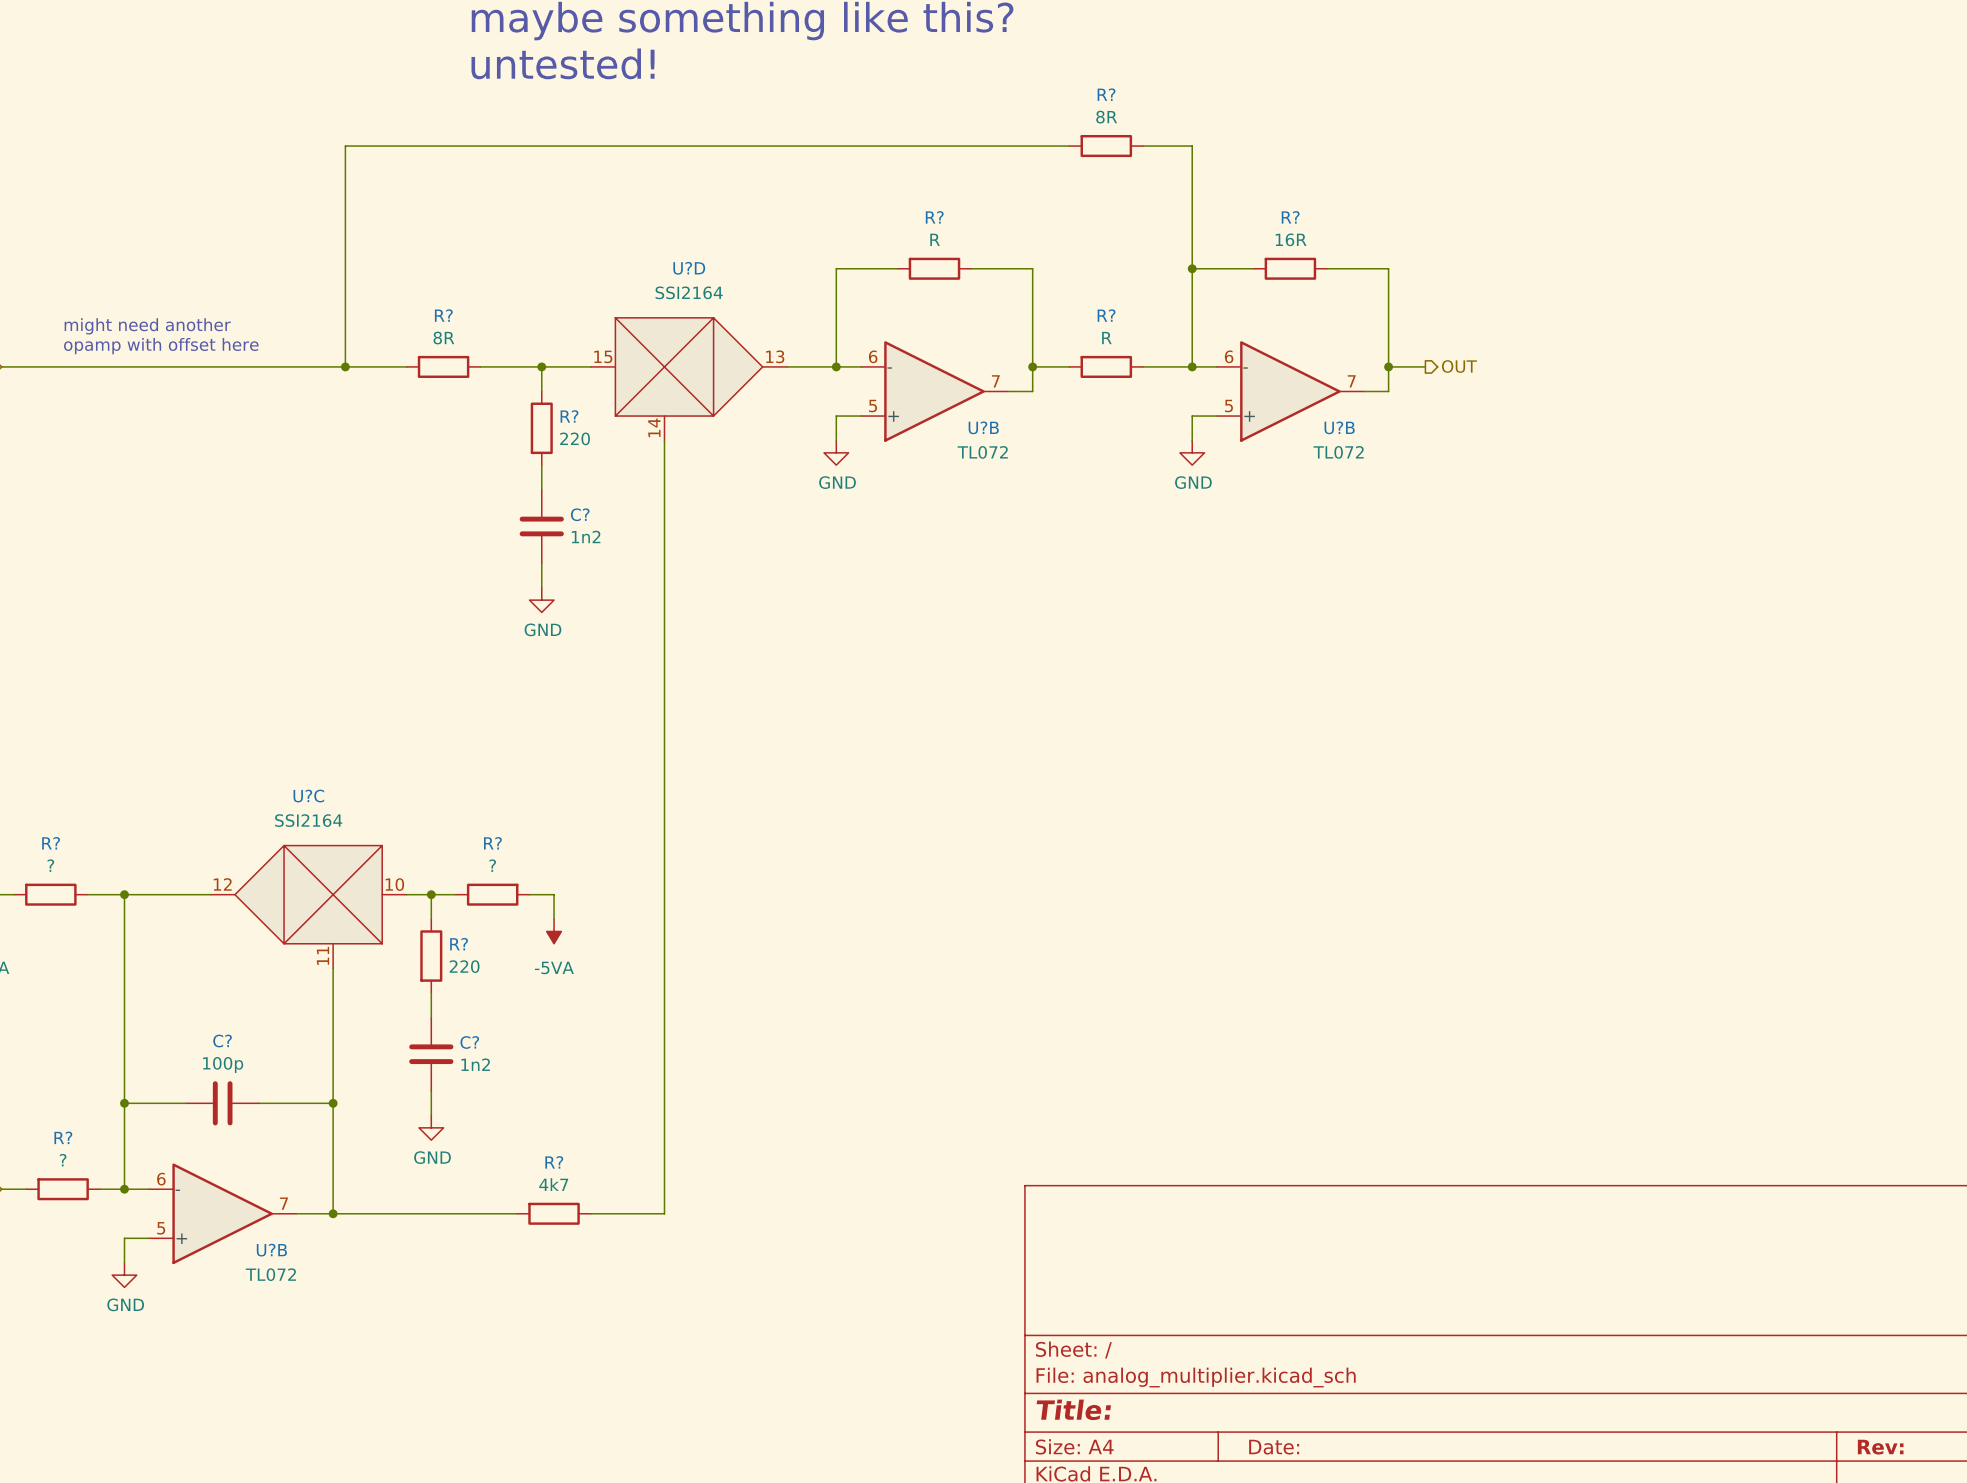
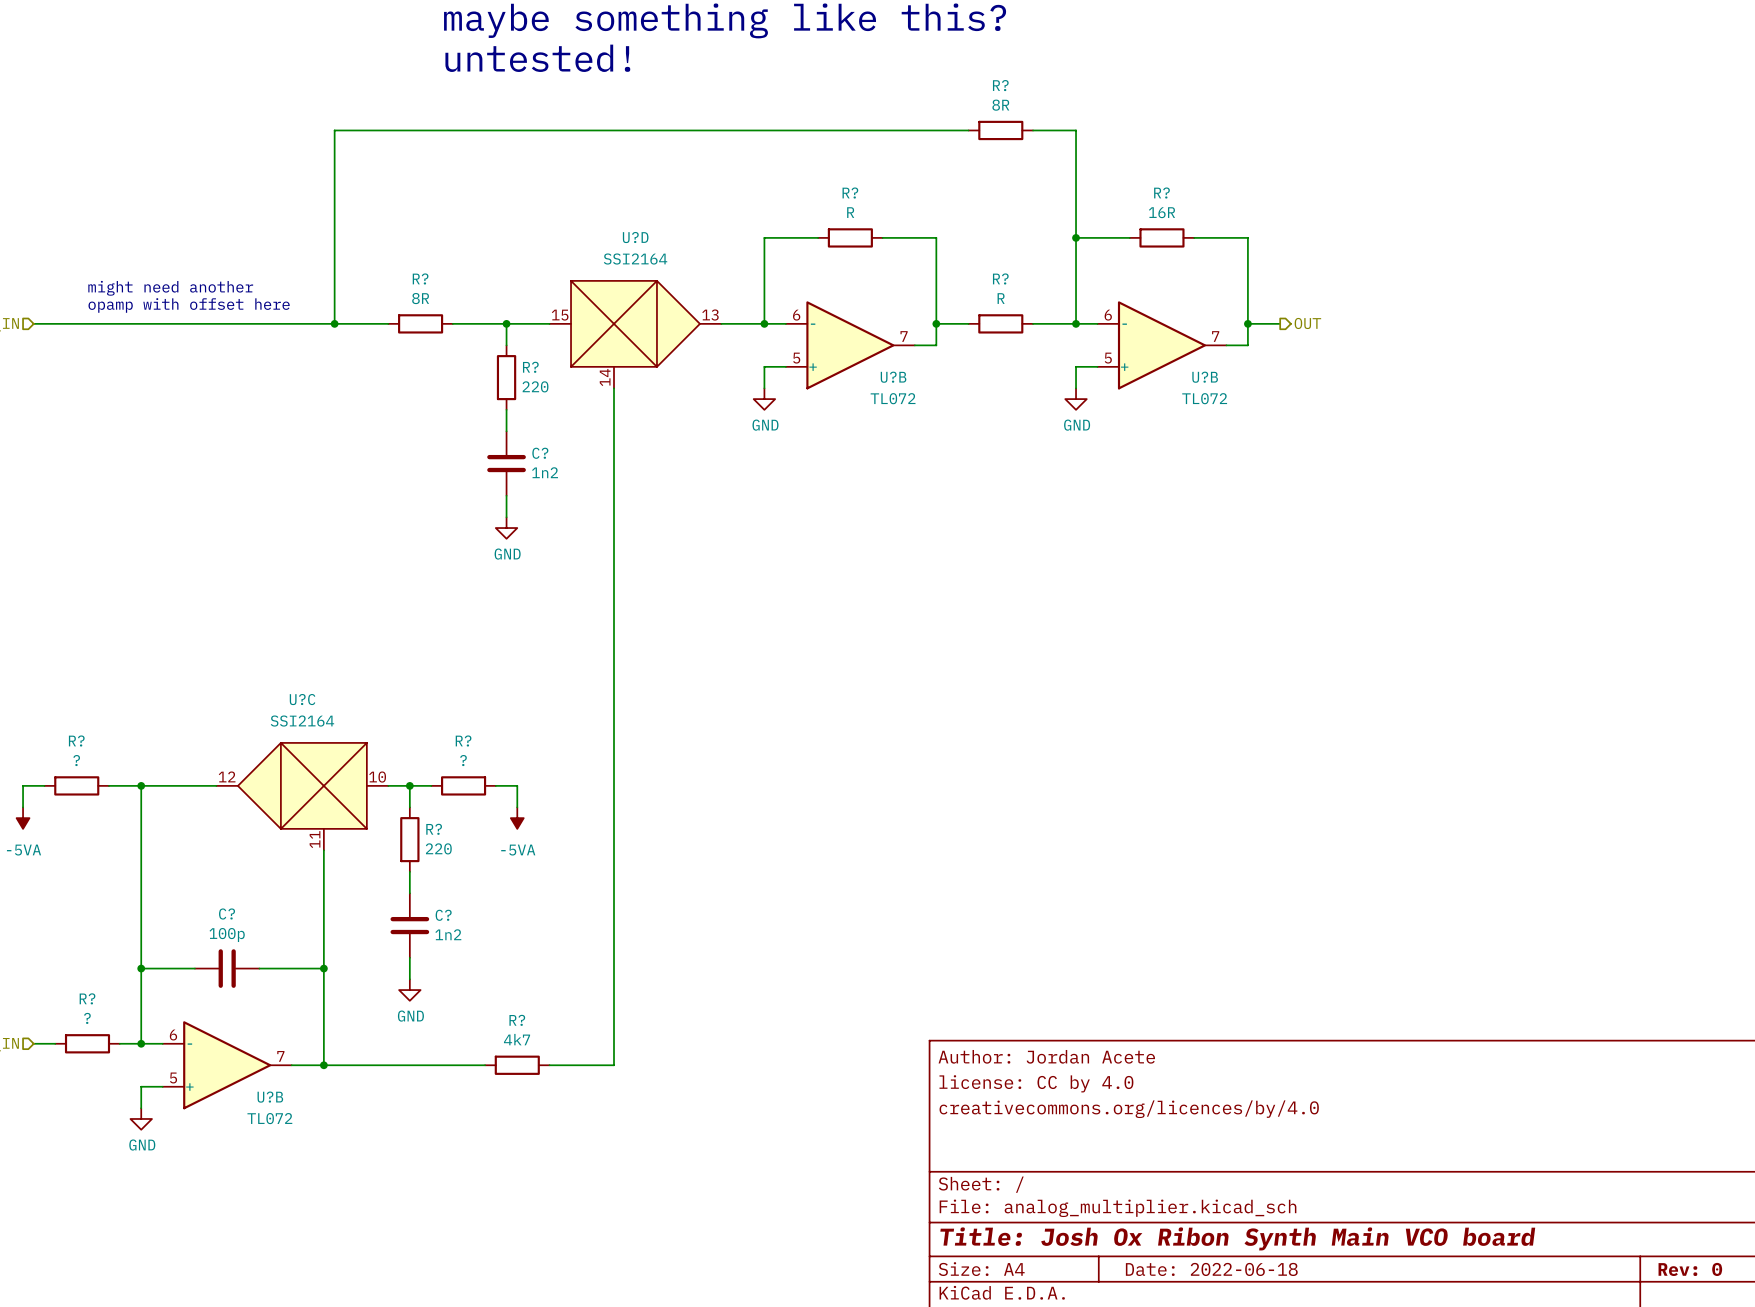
title block: none -> Author: Jordan Acete (1046, 1056)
title block: none -> license: CC by 4.0 (1036, 1083)
title block: none -> creativecommons.org/licences/by/4.0 (1129, 1109)
title block: Title: (1073, 1409) -> Title: Josh Ox Ribon Synth Main VCO board (1237, 1238)
title block: Date: (1274, 1447) -> Date: 2022-06-18 (1211, 1269)
title block: Rev: (1880, 1447) -> Rev: 0 (1690, 1269)

